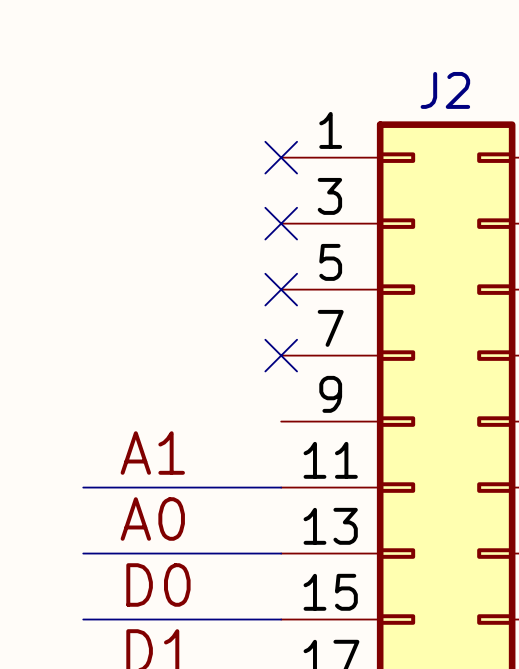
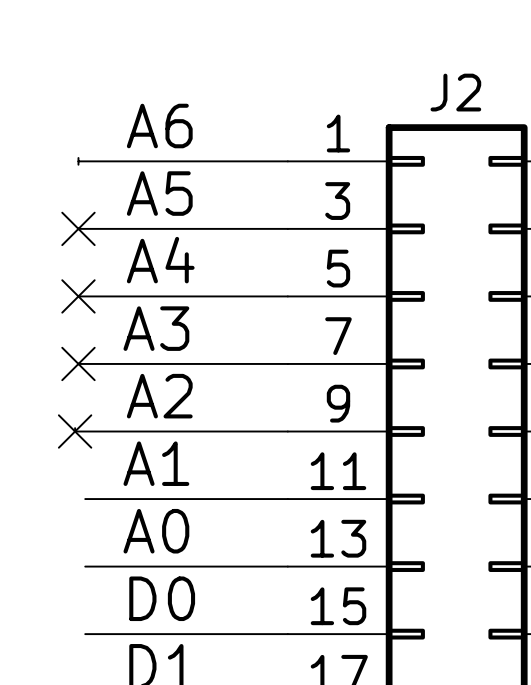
label: none -> A6 (159, 126)
wire: none -> (78, 157) (78, 164)
wire: none -> (78, 161) (287, 161)
no-connect mark: (281, 157) -> none
label: none -> A5 (159, 193)
wire: none -> (78, 228) (287, 228)
no-connect mark: none -> (78, 228)
no-connect mark: (281, 223) -> none
label: none -> A4 (160, 260)
wire: none -> (78, 296) (287, 296)
no-connect mark: none -> (78, 296)
no-connect mark: (281, 289) -> none
label: none -> A3 (156, 328)
wire: none -> (78, 363) (287, 363)
no-connect mark: none -> (78, 363)
no-connect mark: (281, 355) -> none
label: none -> A2 (159, 396)
wire: none -> (75, 428) (75, 431) (287, 431)
no-connect mark: none -> (75, 431)

